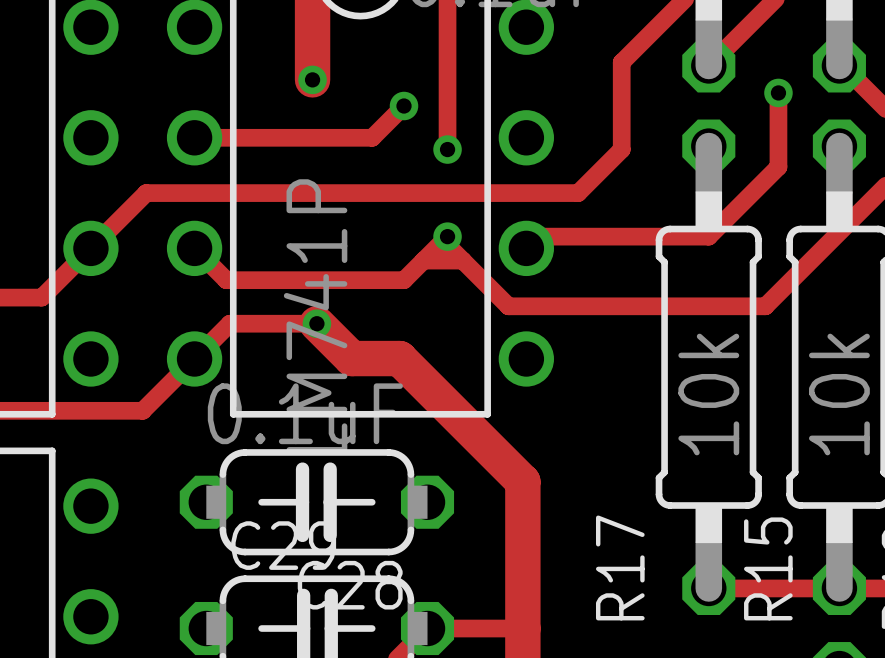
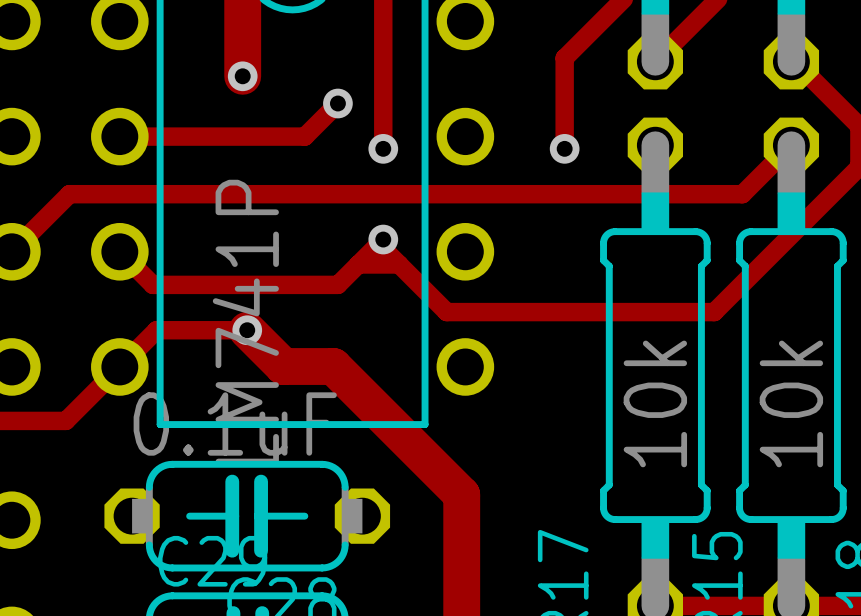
track: (778, 92) (778, 166) (708, 236) (538, 236) (526, 248) -> none
via position: (778, 92) -> (564, 148)
track: (621, 149) (578, 193) -> (791, 145) (742, 194) (519, 194)

